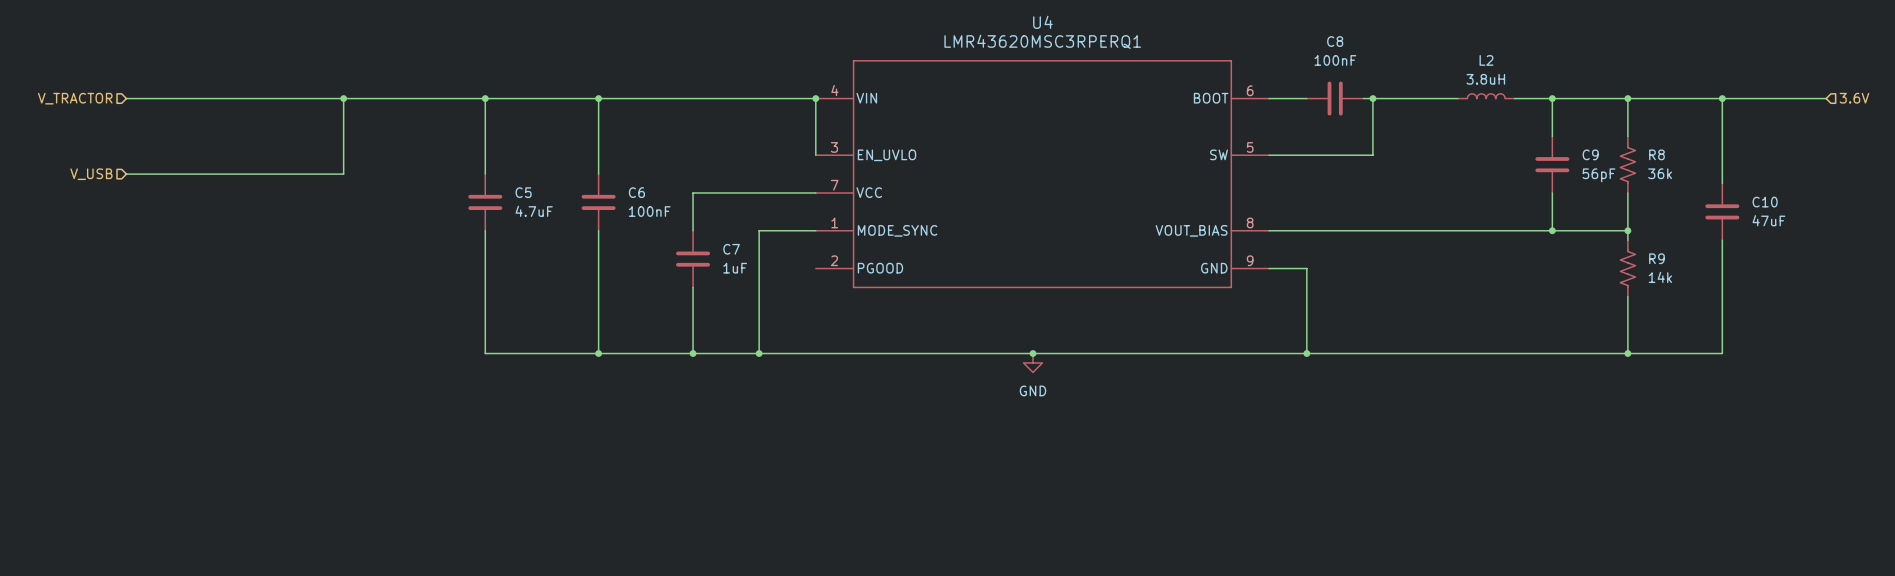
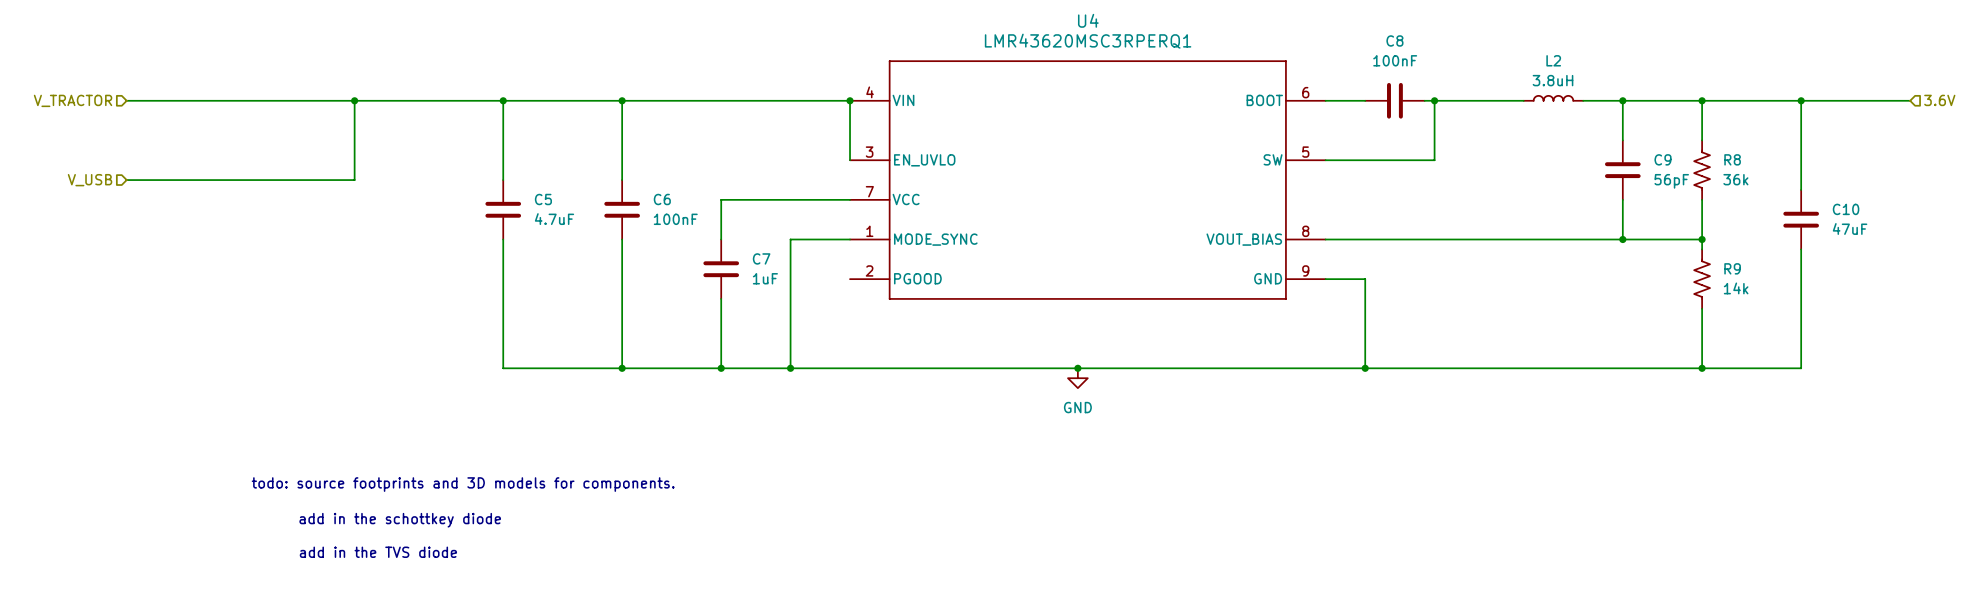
text: none -> todo: source footprints and 3D models for components. (463, 484)
text: none -> add in the schottkey diode (400, 520)
text: none -> add in the TVS diode (378, 552)

